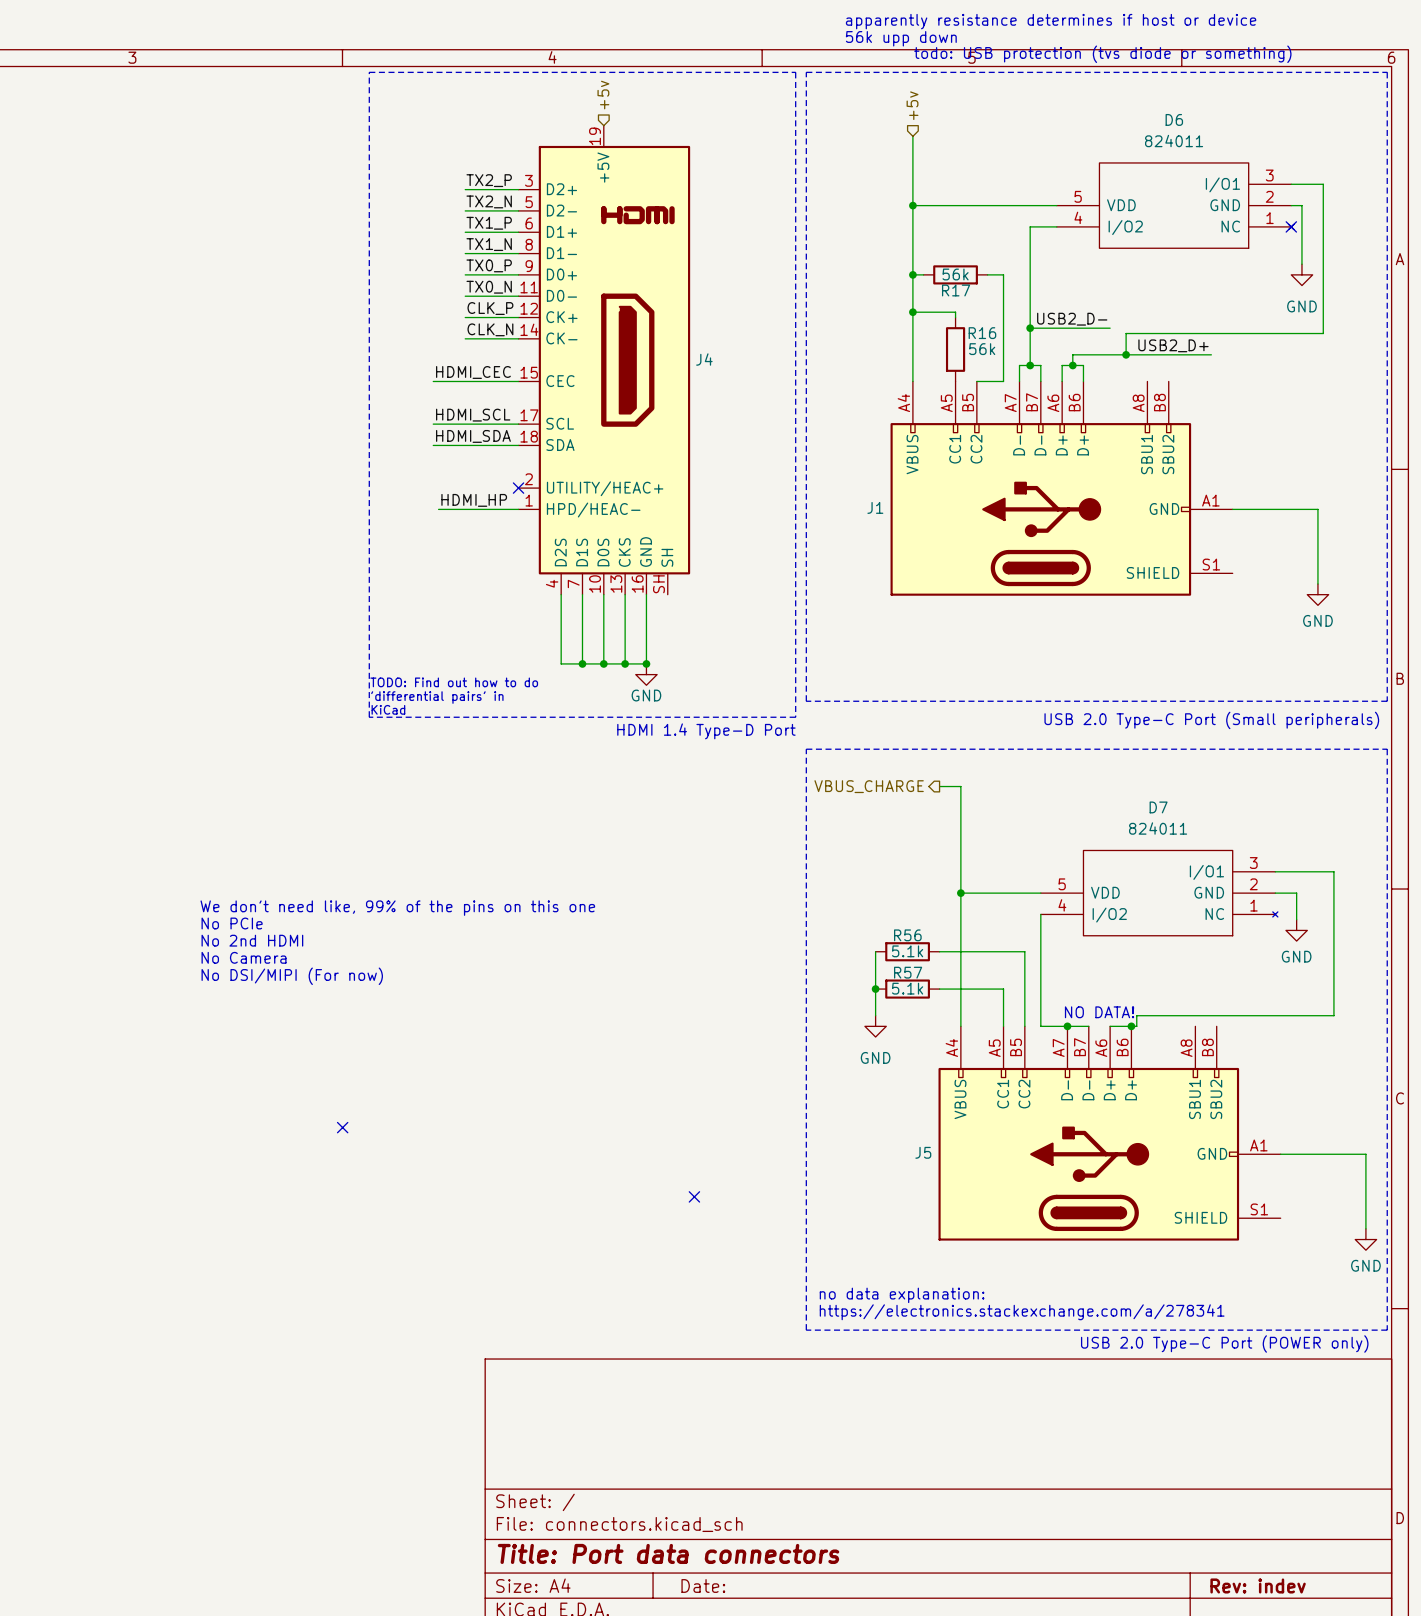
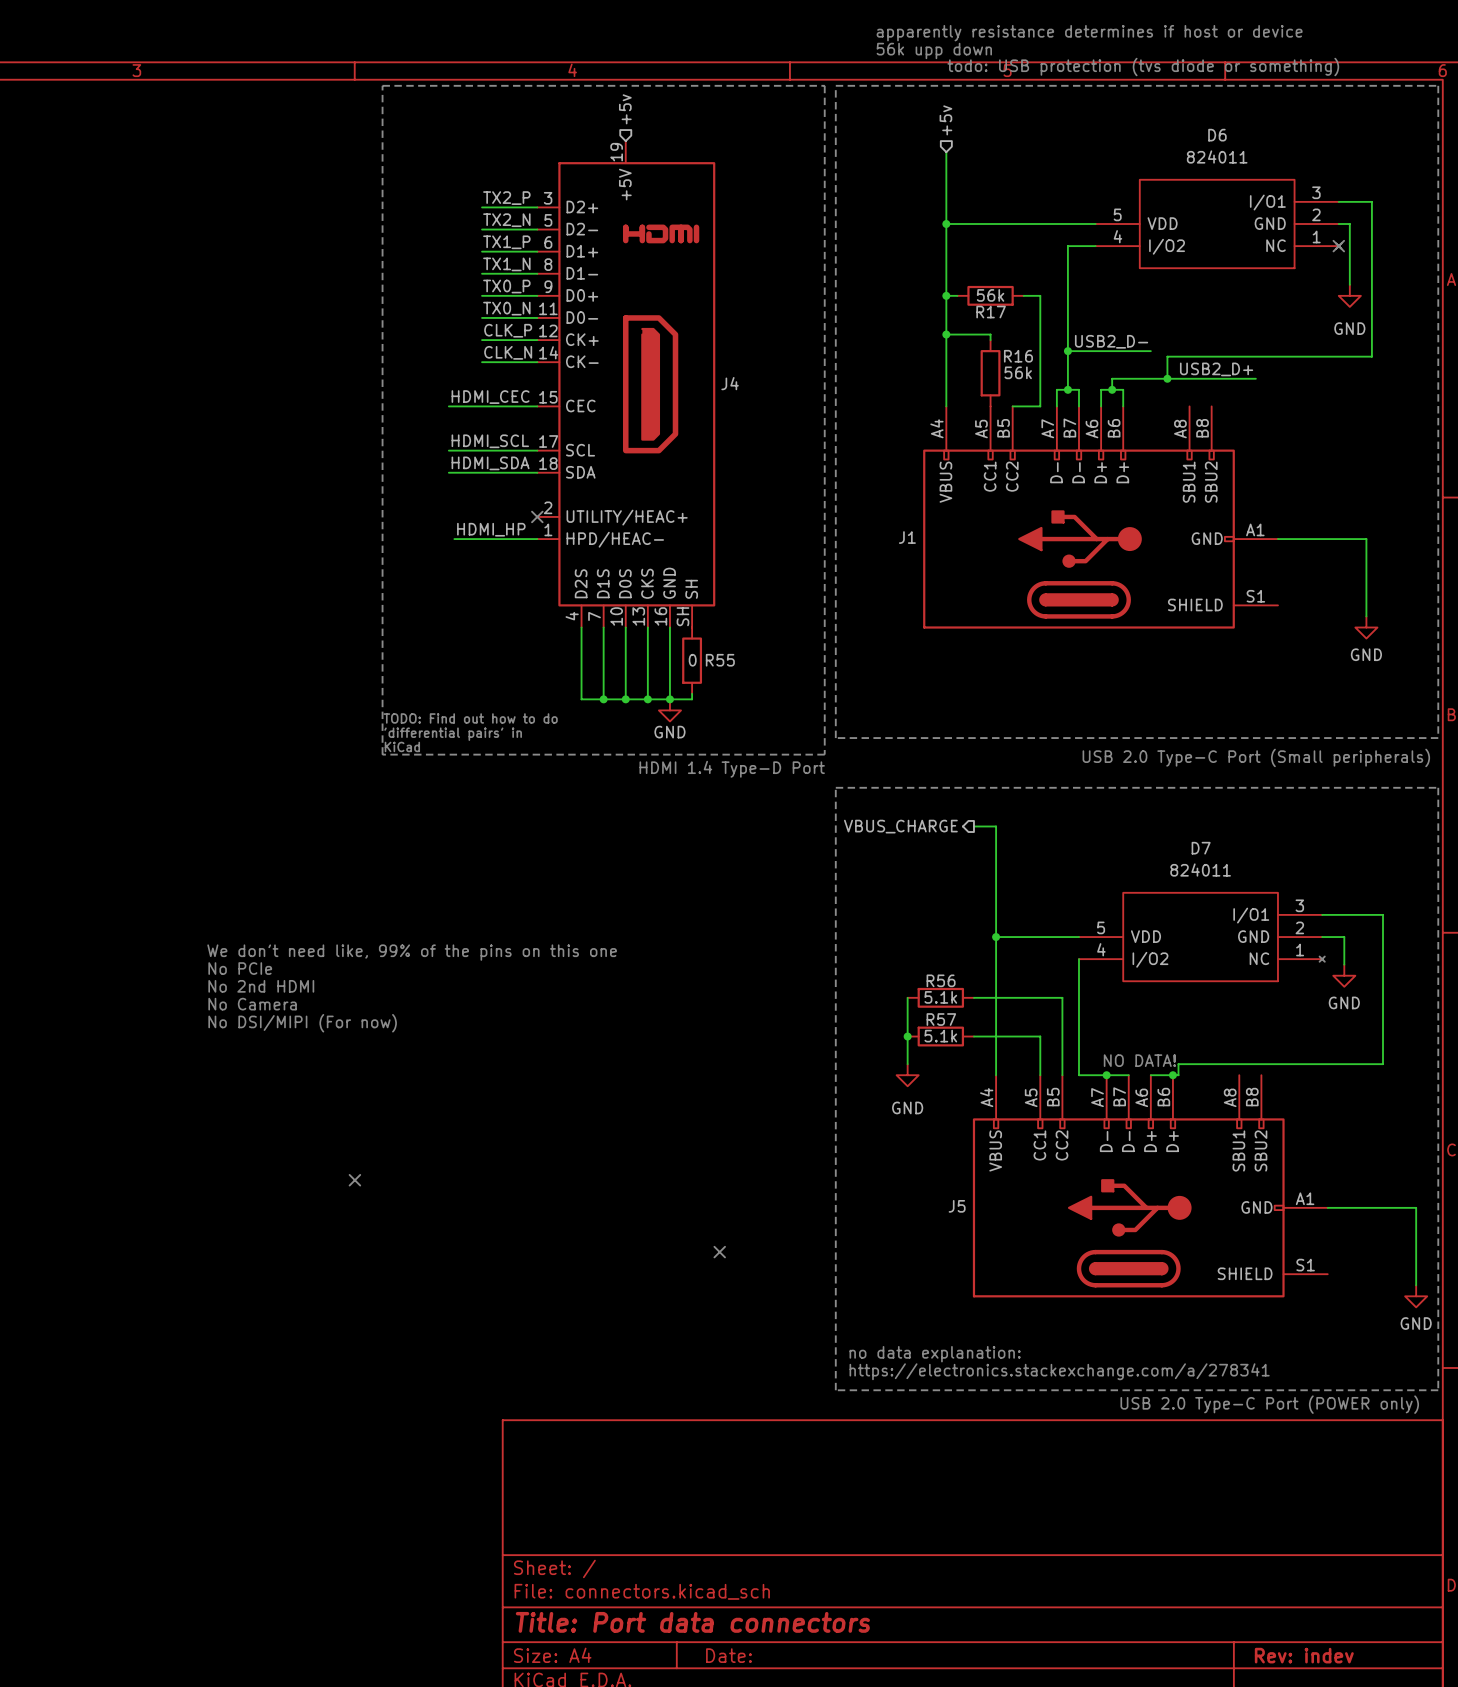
R55: none -> 0 (692, 660)
wire: none -> (692, 693) (692, 699) (669, 699)

